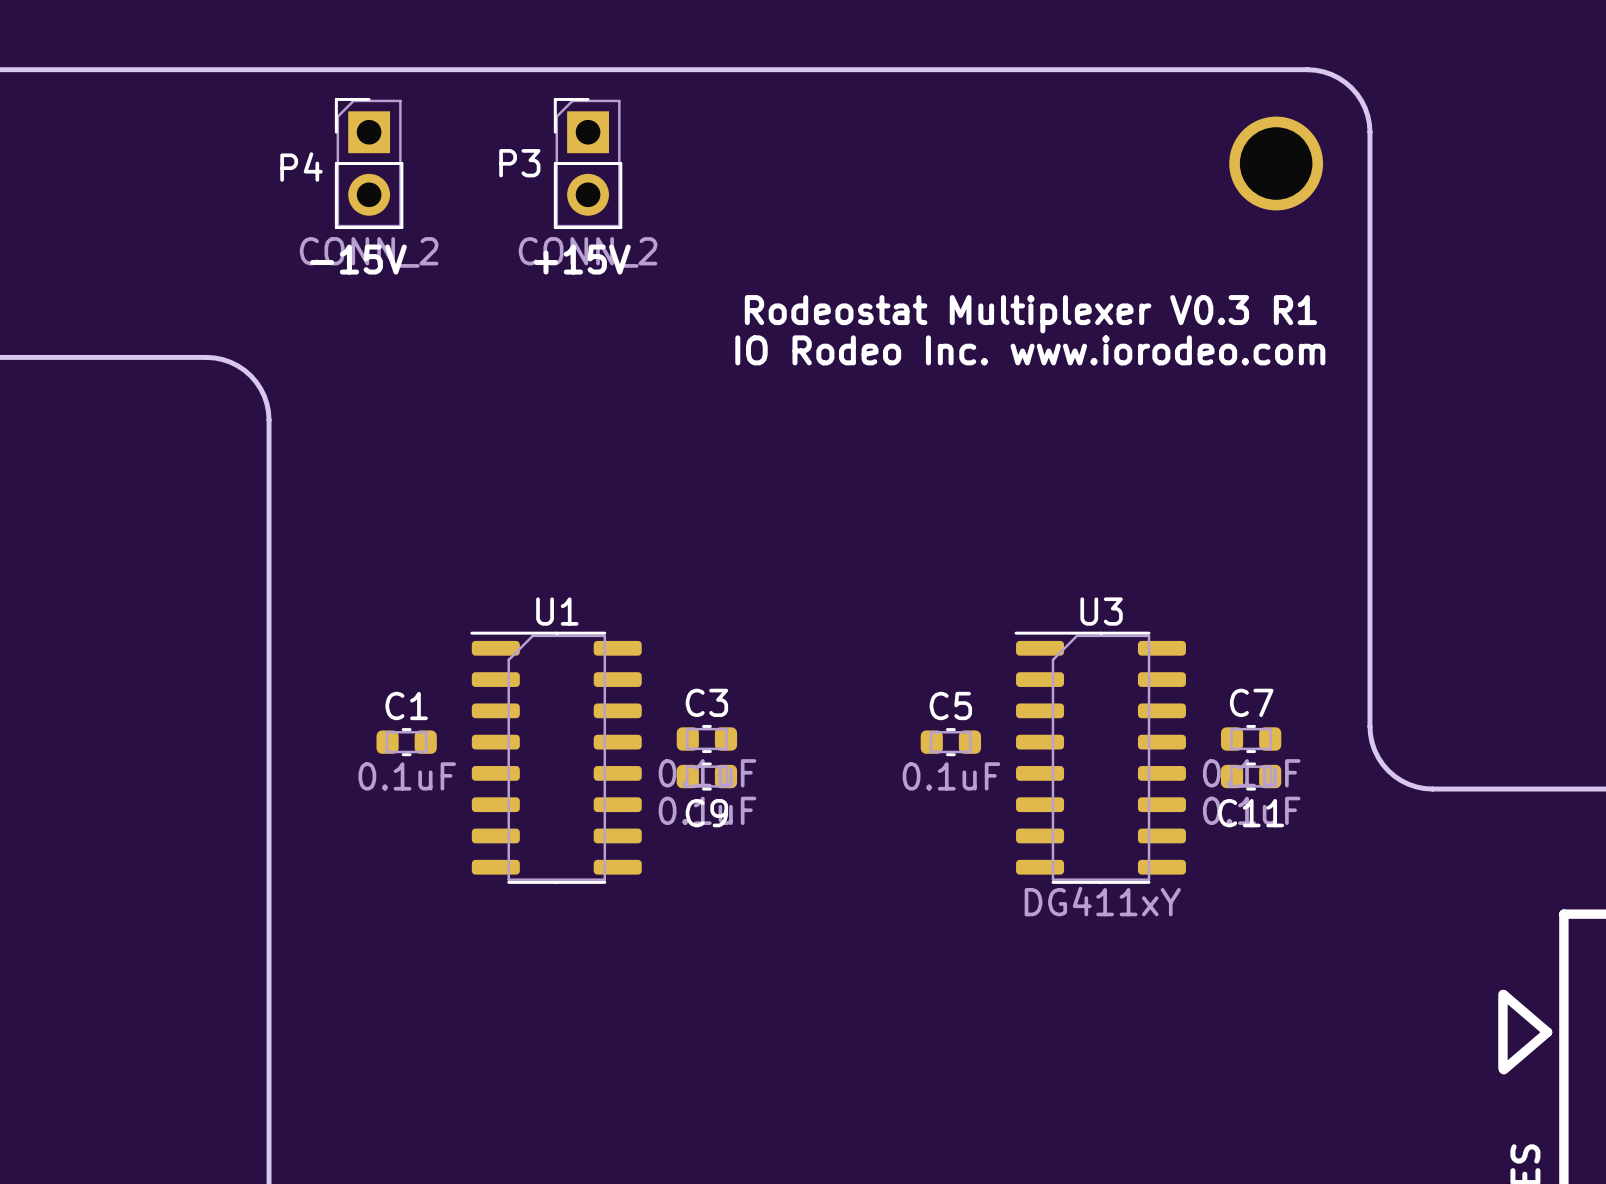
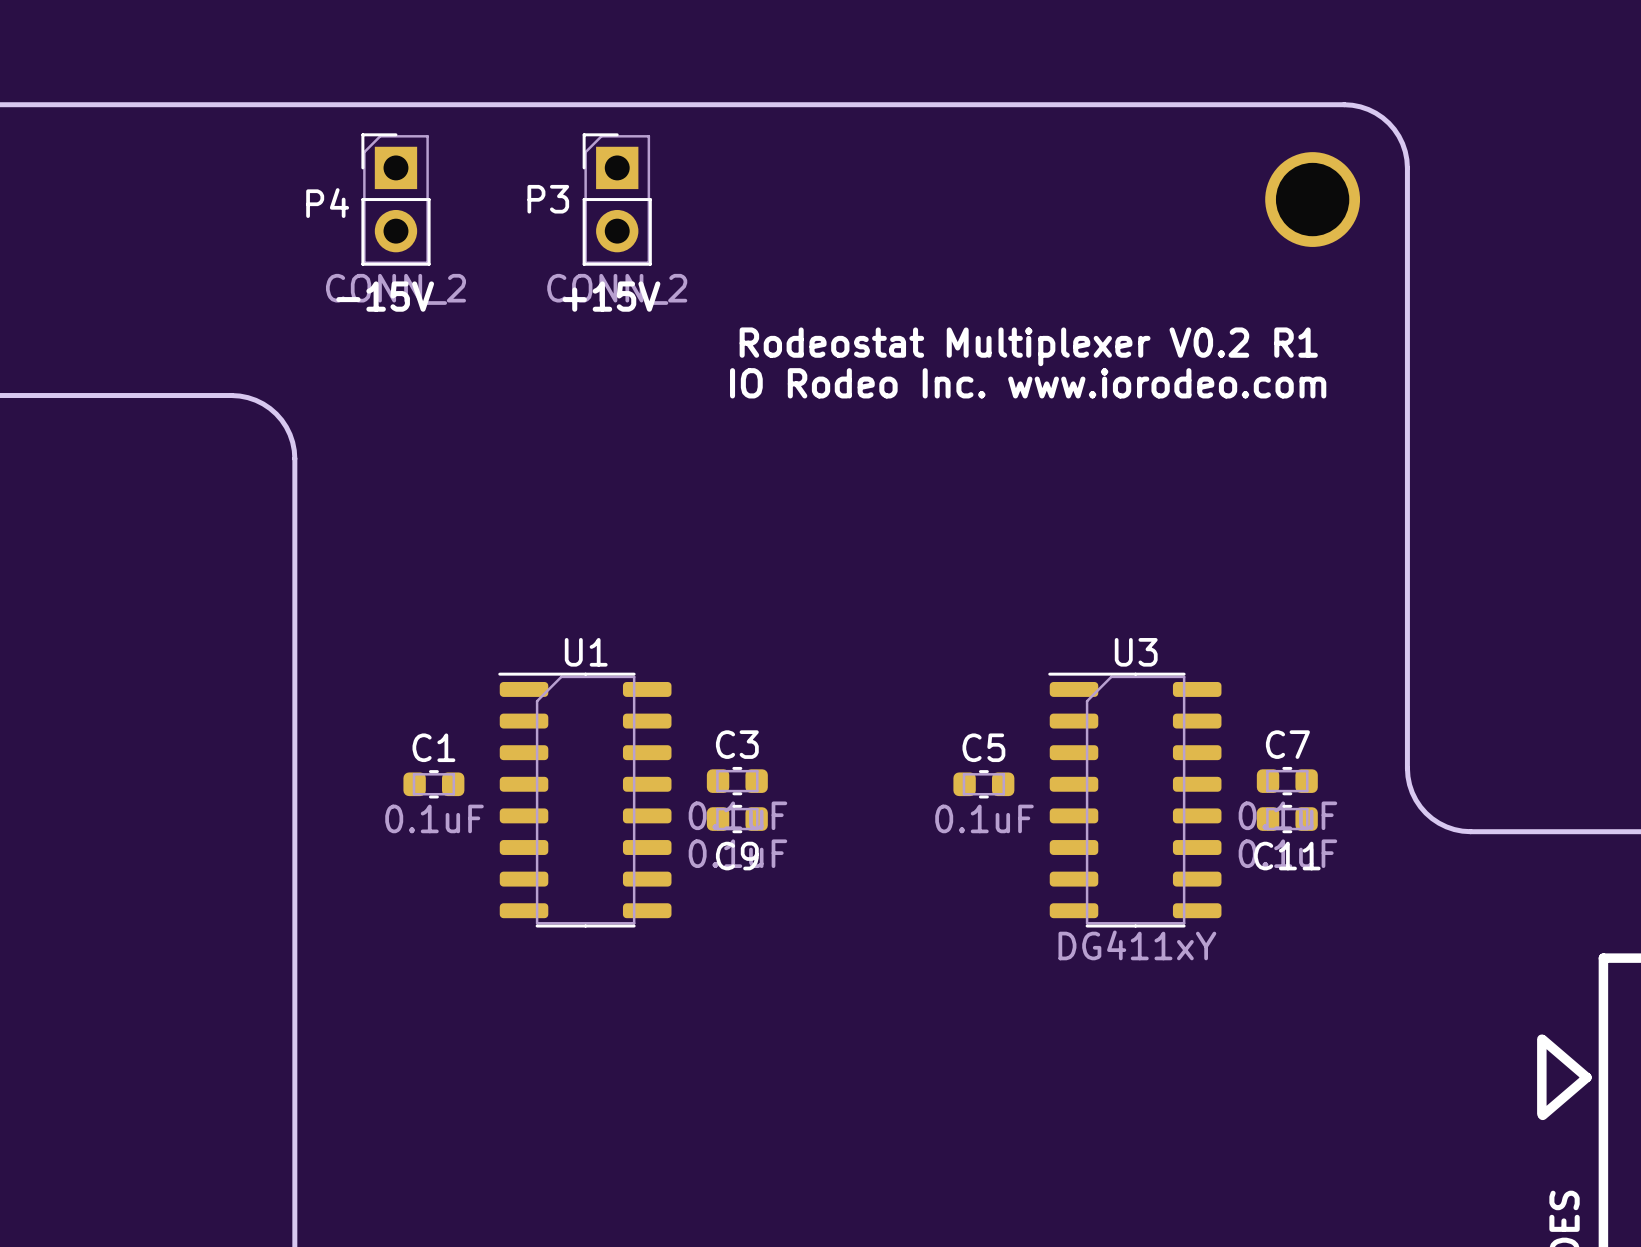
text: Rodeostat Multiplexer V0.3 R1 (1030, 314) -> Rodeostat Multiplexer V0.2 R1 (1028, 346)
text position: IO Rodeo Inc. www.iorodeo.com (1030, 350) -> IO Rodeo Inc. www.iorodeo.com (1028, 383)

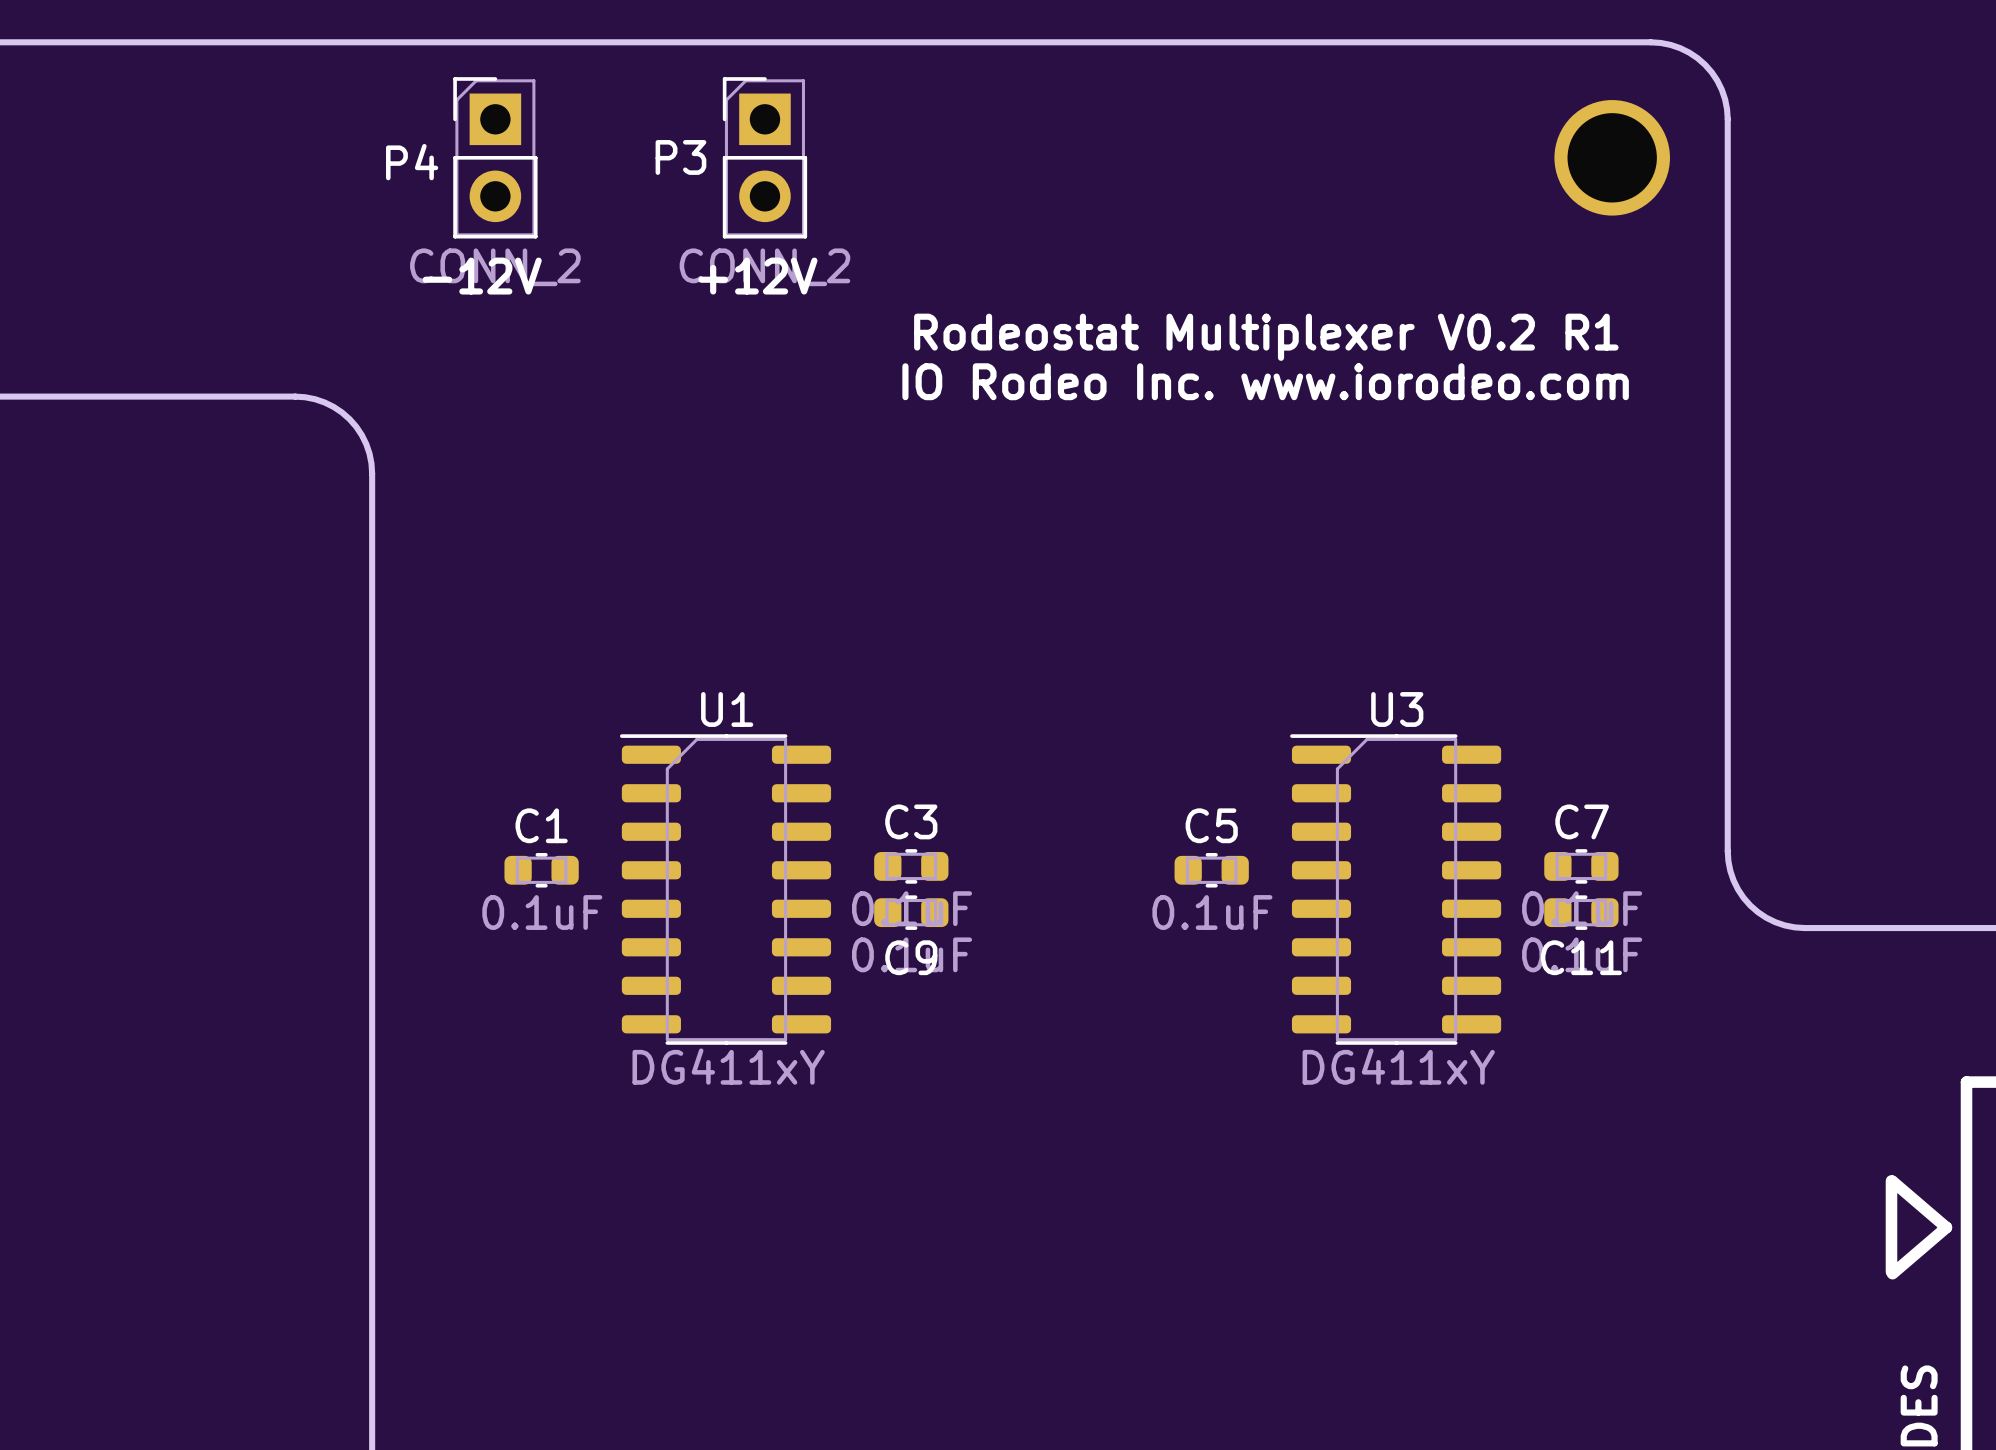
text: -15V (385, 296) -> -12V (482, 276)
text: +15V (611, 296) -> +12V (757, 276)
U1 value: none -> DG411xY (728, 1066)

